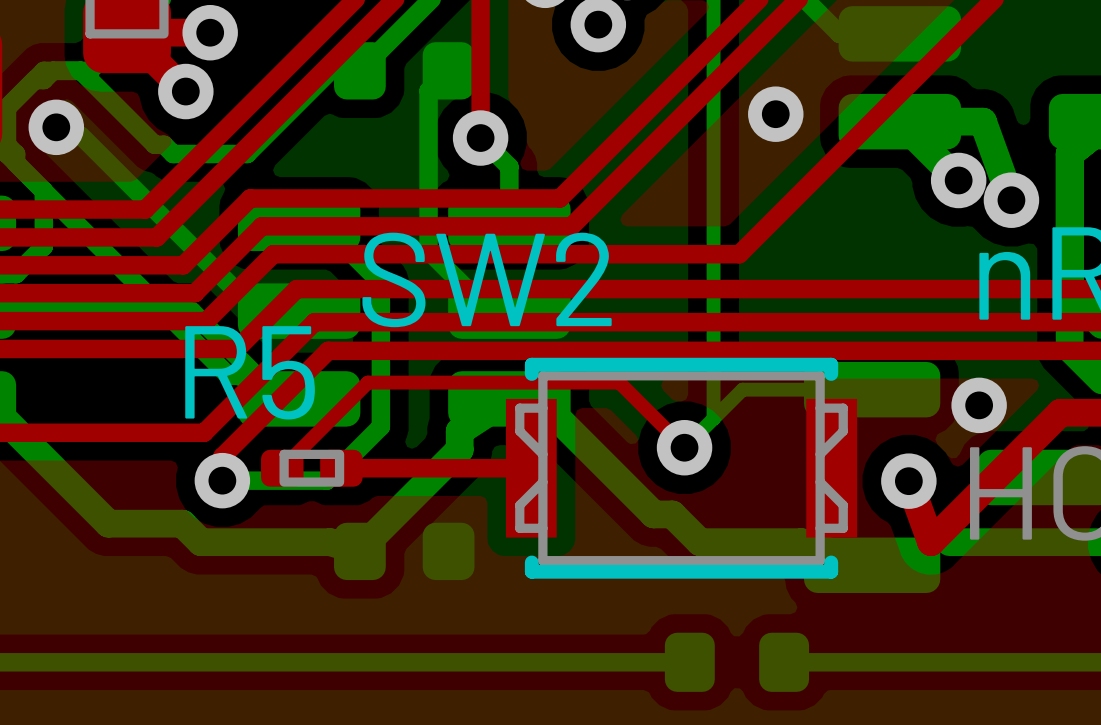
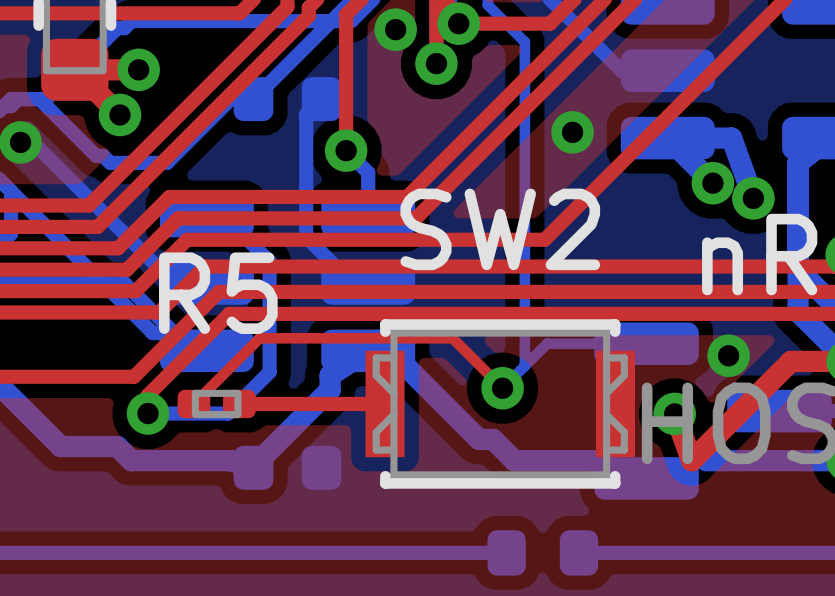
SW2 name position: SW2 (487, 279) -> SW2 (500, 229)
R5 name position: R5 (250, 372) -> R5 (218, 293)

